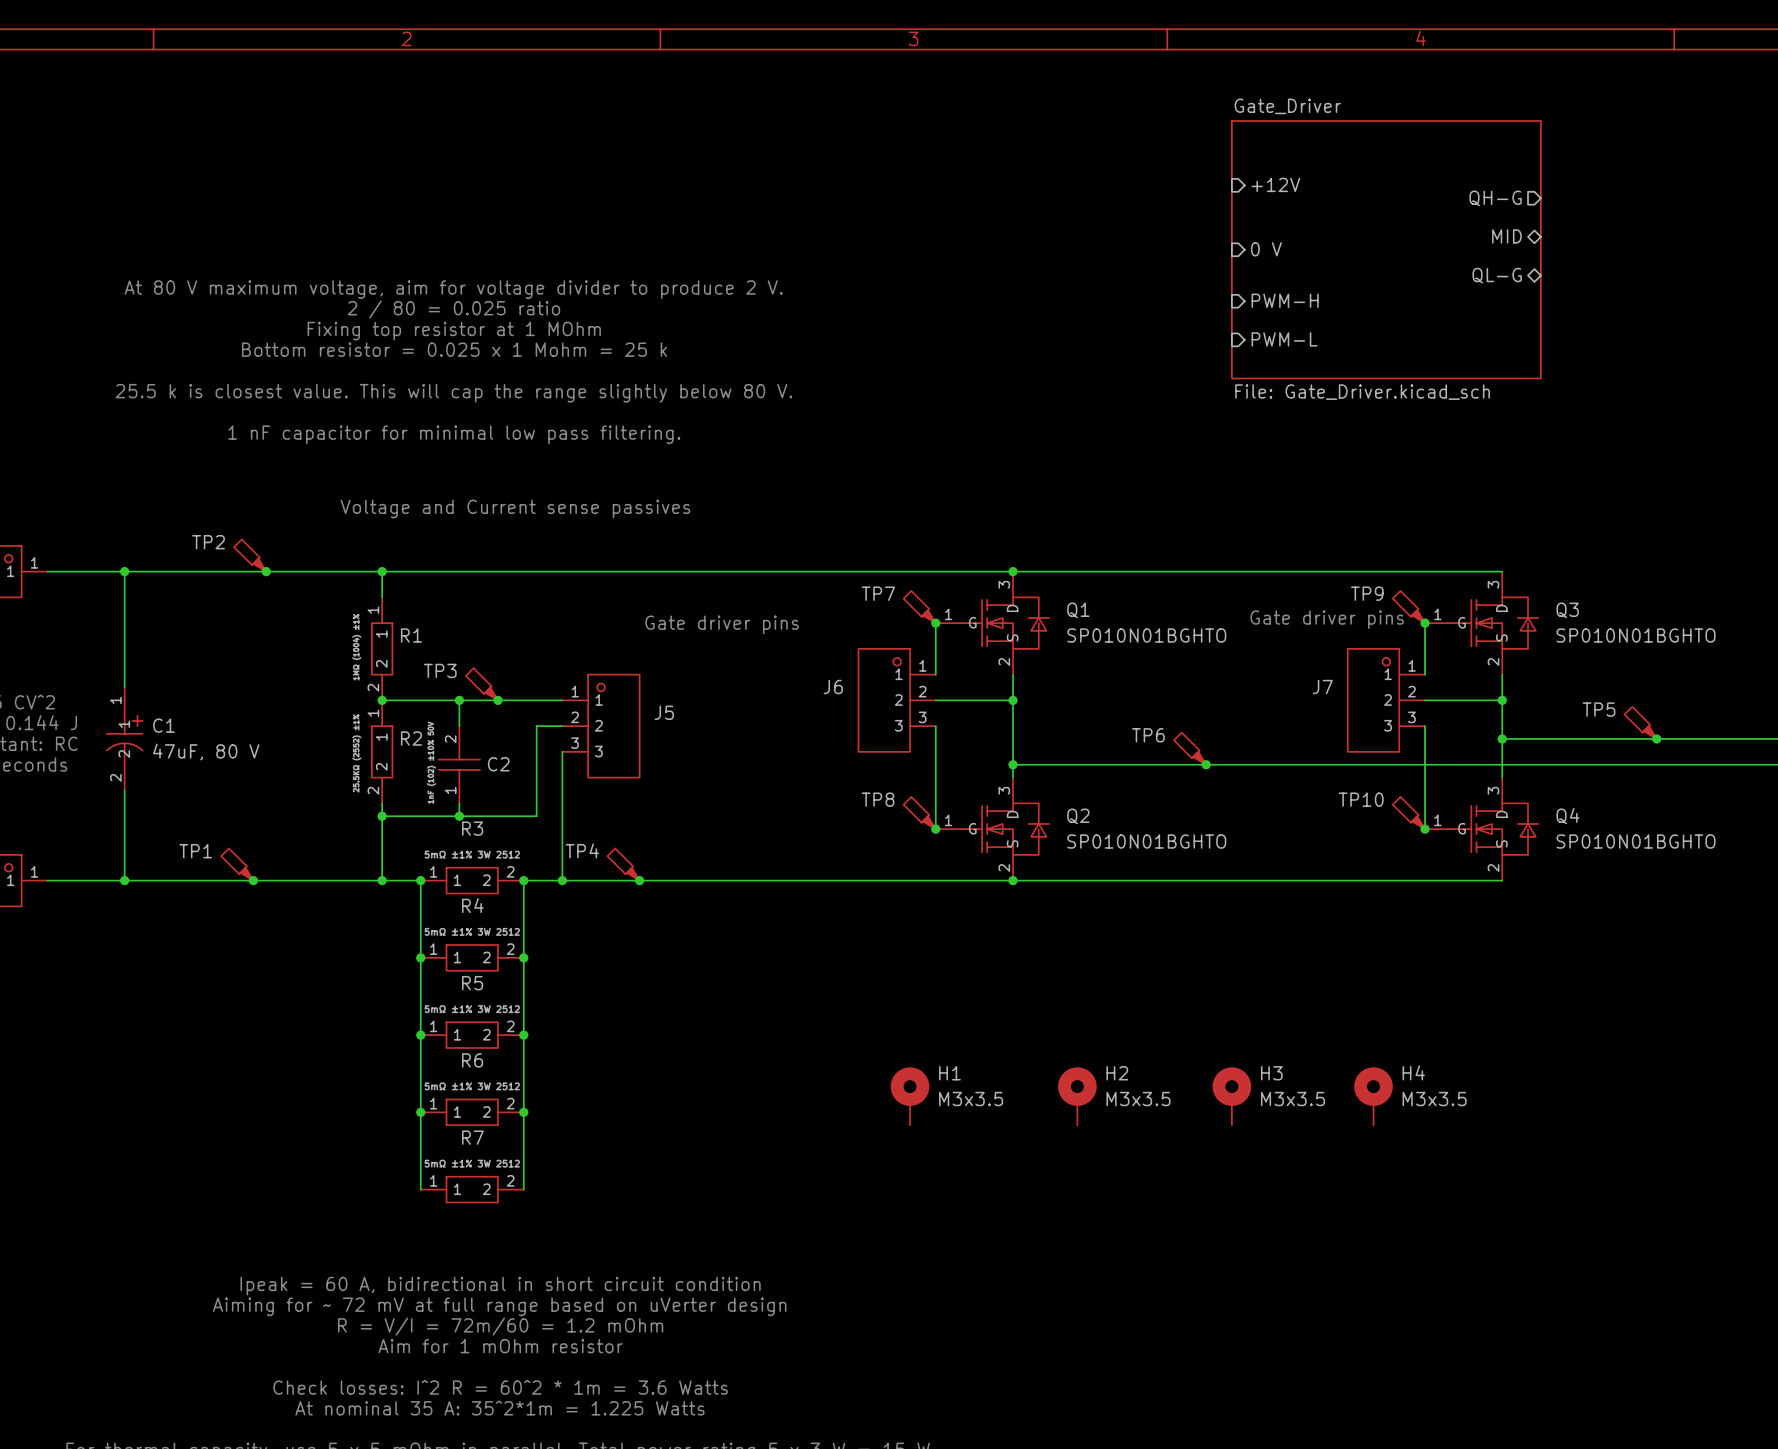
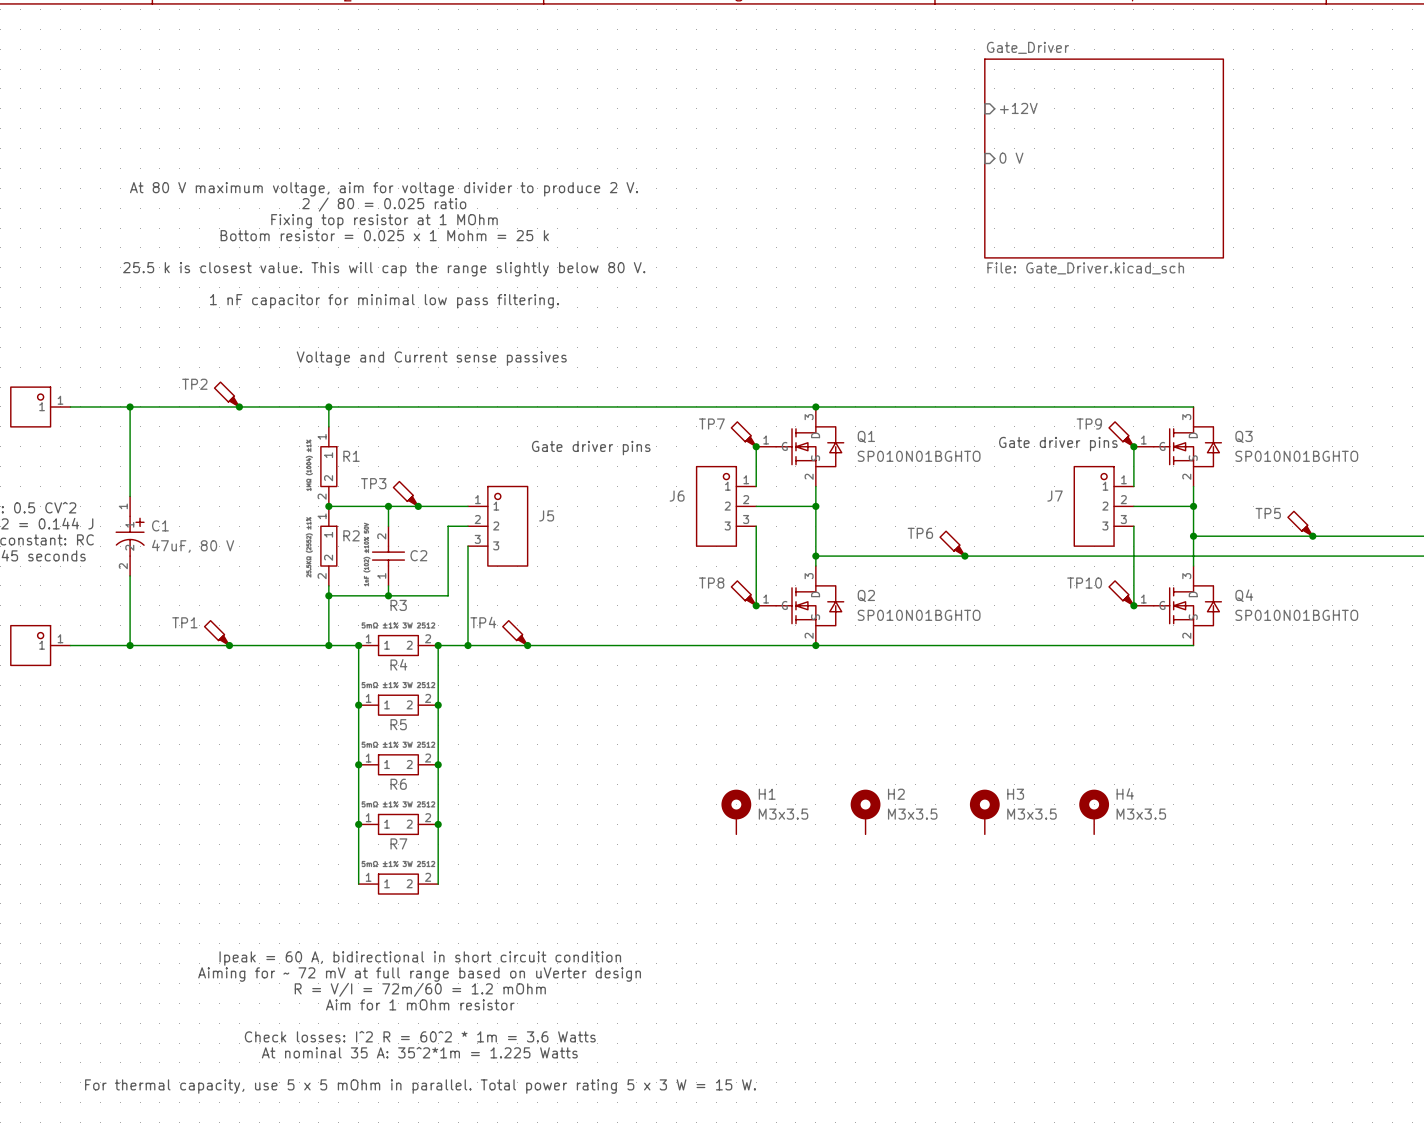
sheet pin: QH-G (1495, 198) -> none
sheet pin: MID (1506, 236) -> none
sheet pin: QL-G (1497, 275) -> none
sheet pin: PWM-H (1285, 300) -> none
sheet pin: PWM-L (1284, 339) -> none

